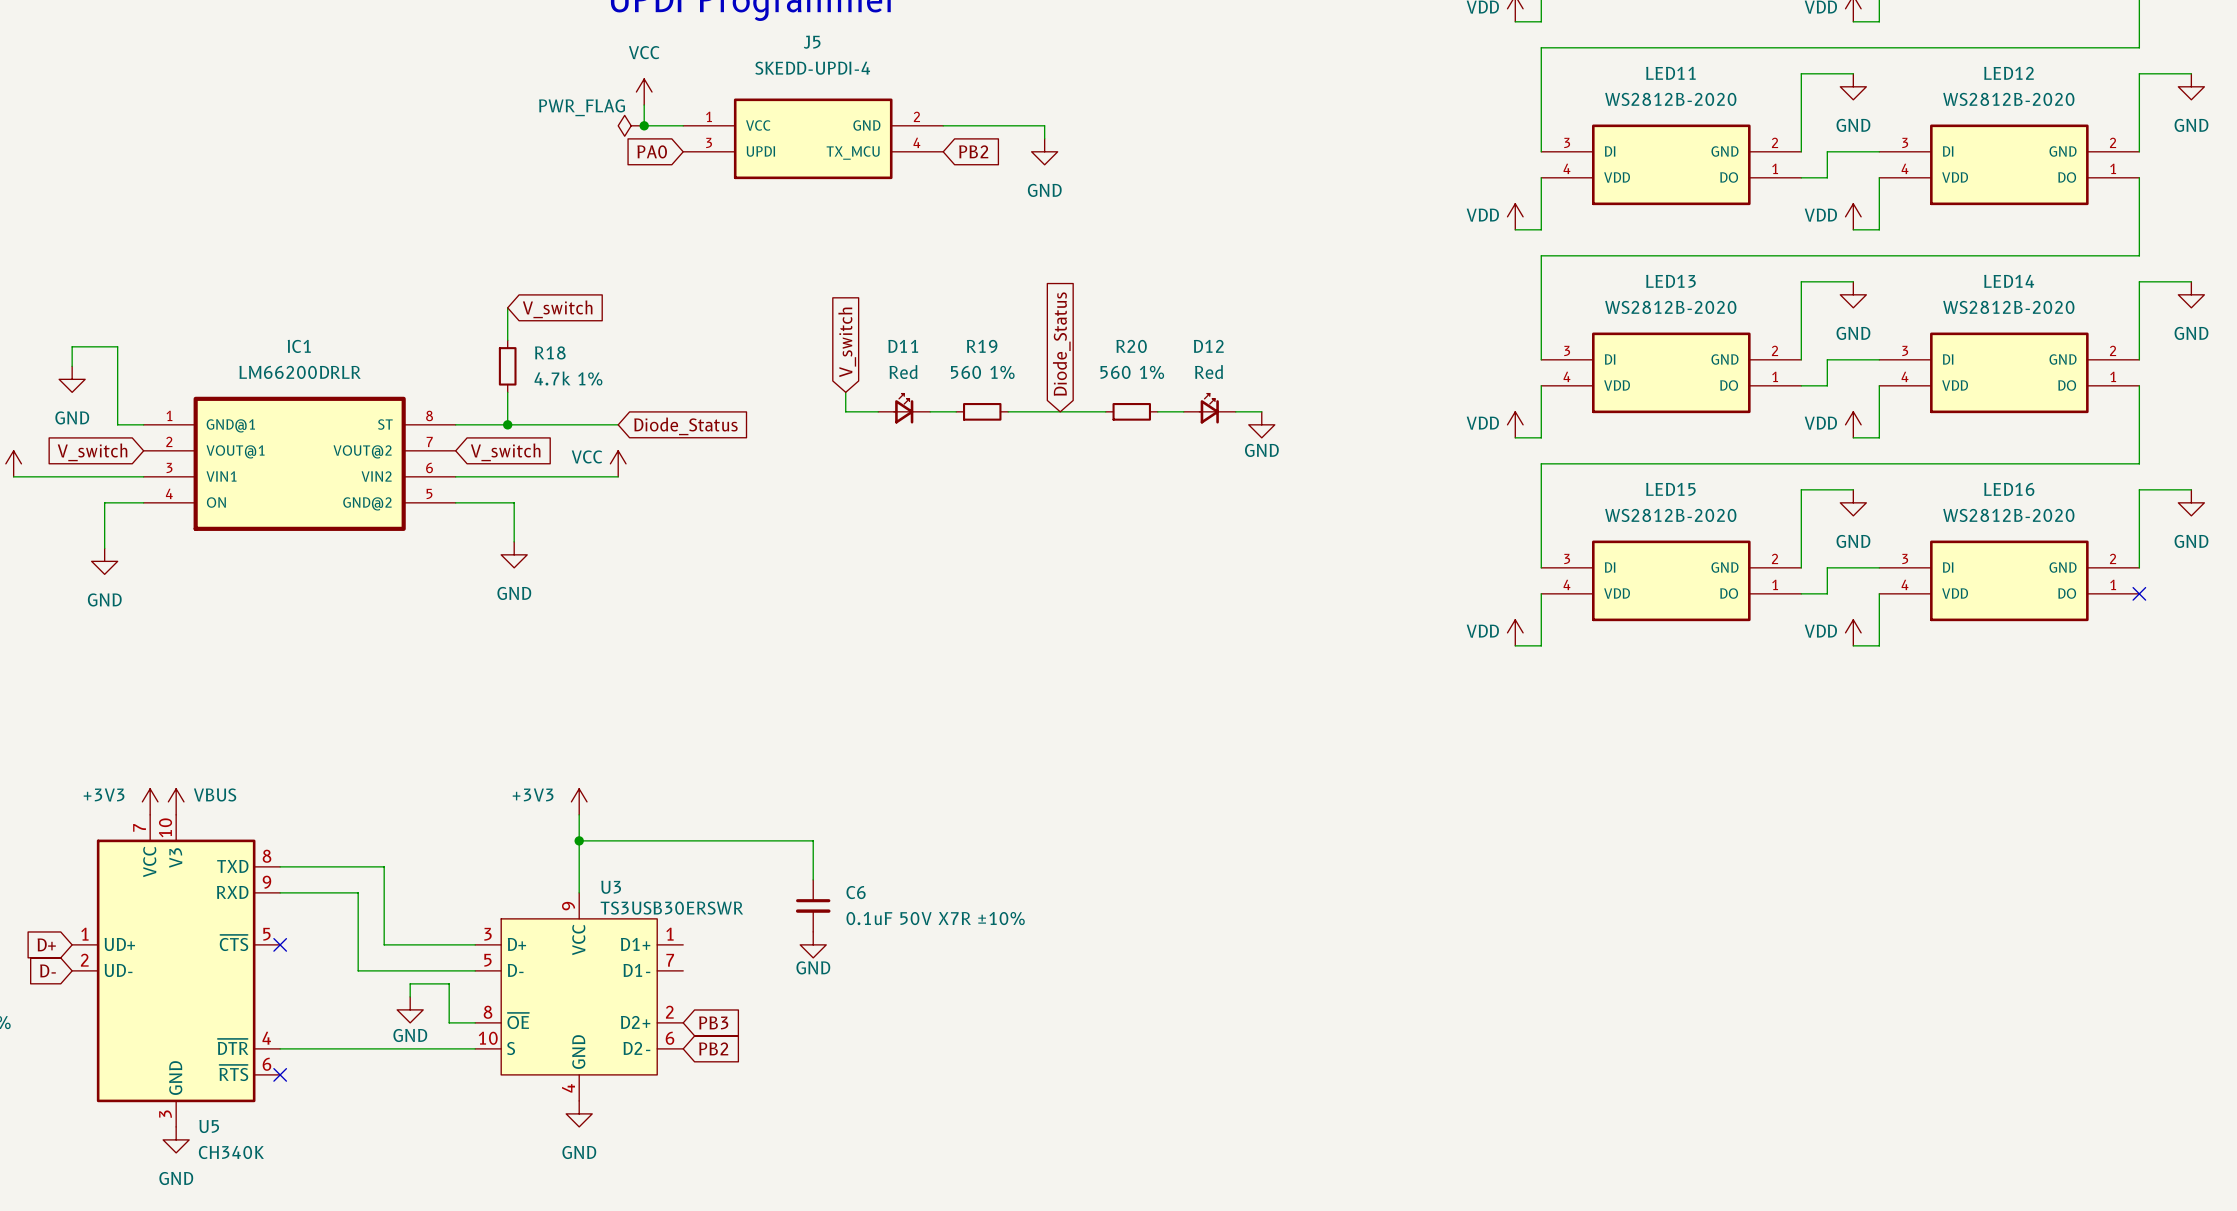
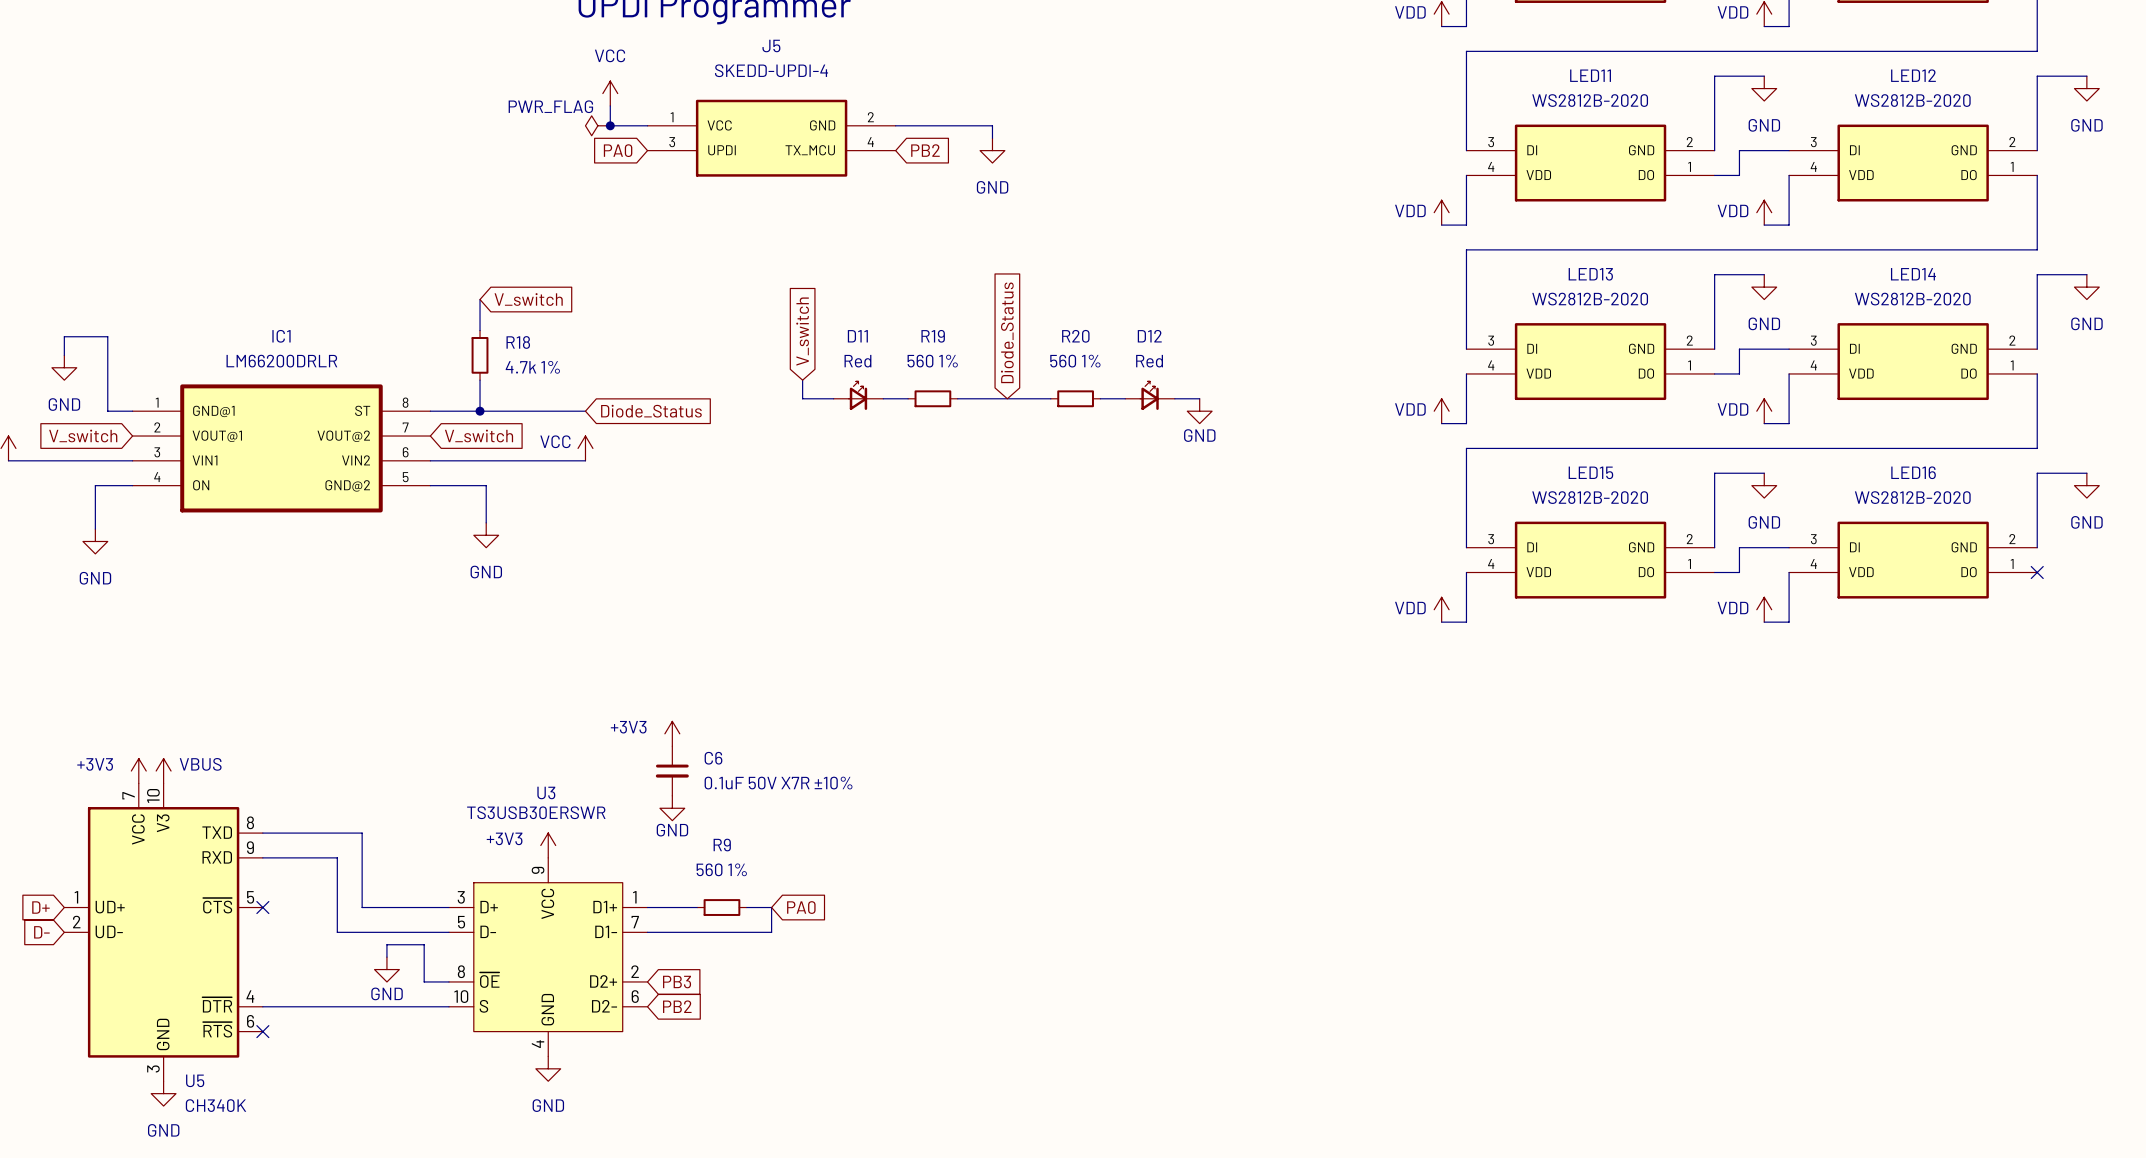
power symbol: none -> +3V3 (672, 733)
power symbol: +3V3 (579, 801) -> none
wire: (579, 814) (579, 892) -> none
wire: (579, 840) (813, 840) (813, 879) -> none
junction: (579, 840) -> none
power symbol: none -> +3V3 (548, 845)
U3 name position: U3 (611, 887) -> U3 (546, 792)
C6 position: (813, 905) -> (672, 771)
U3 value position: TS3USB30ERSWR (671, 908) -> TS3USB30ERSWR (536, 812)
wire: none -> (647, 907) (697, 907)
R9: none -> 560 1% (721, 907)
wire: none -> (746, 907) (771, 907) (771, 932) (647, 932)
power symbol position: GND (813, 944) -> GND (672, 808)
global label: none -> PA0 (801, 907)

